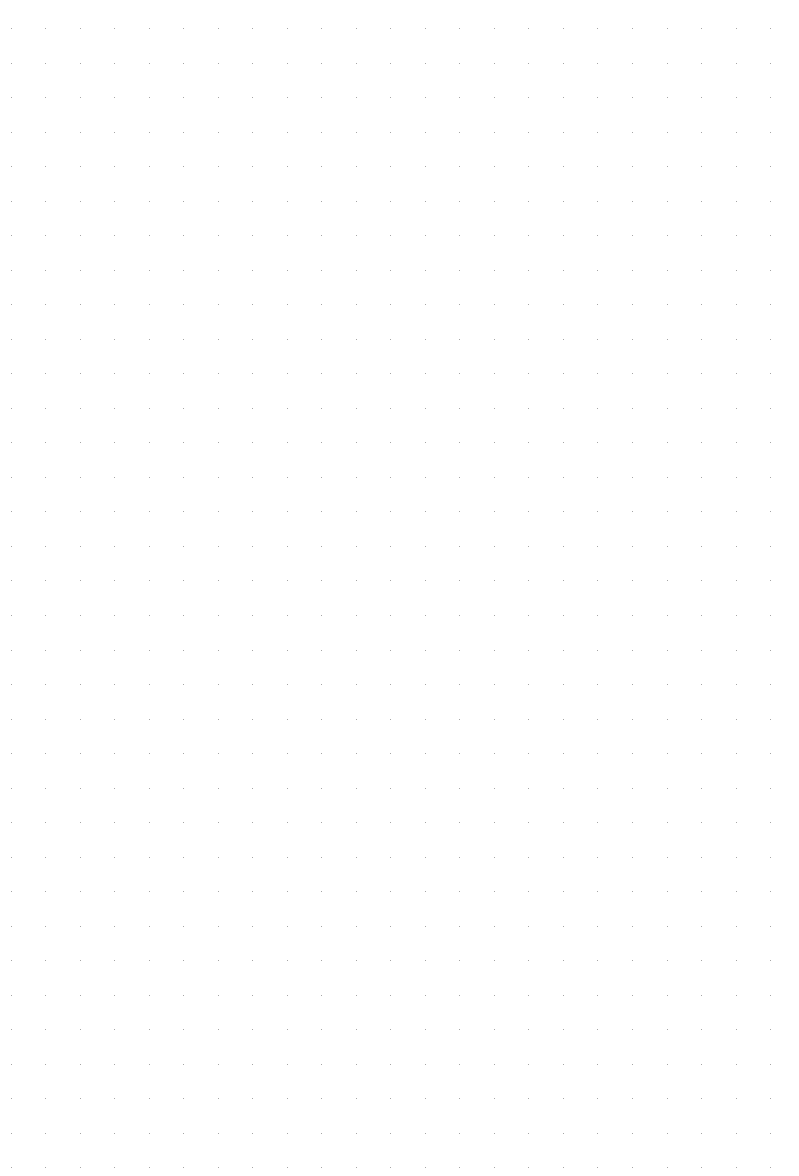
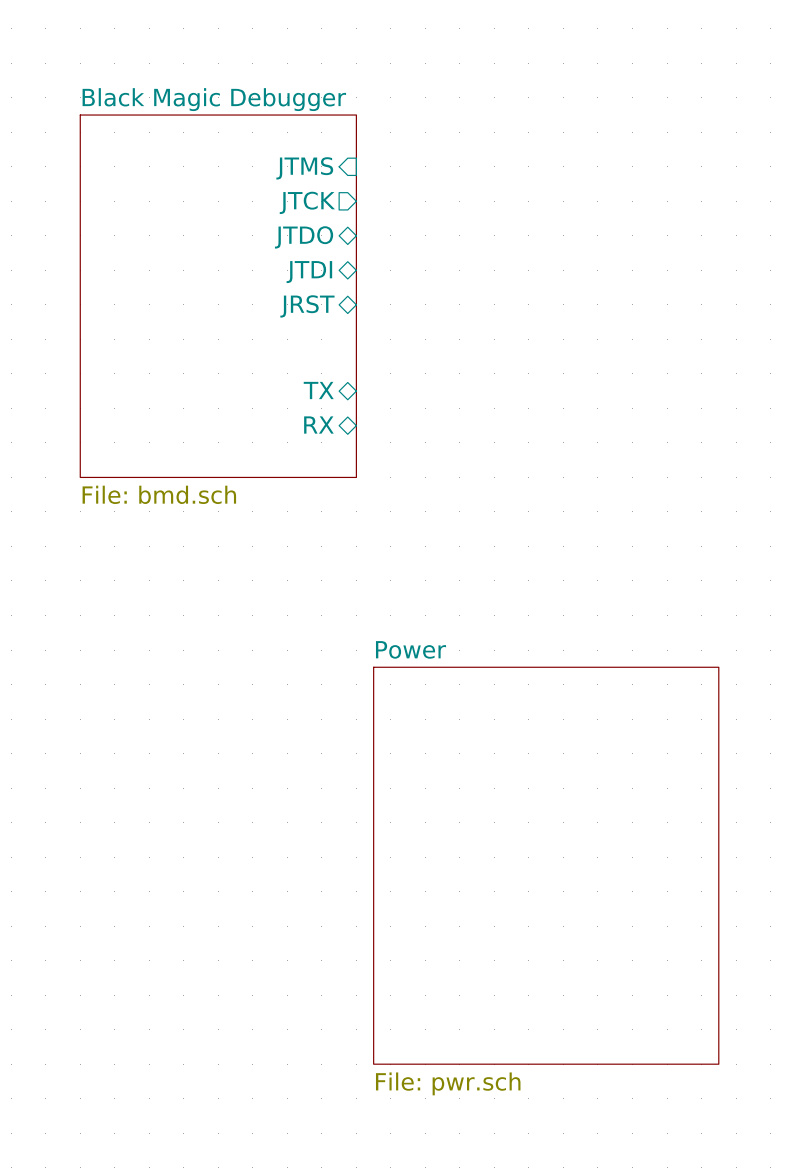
sheet pin: none -> JTMS (304, 168)
sheet pin: none -> JTCK (307, 202)
sheet pin: none -> JTDO (304, 237)
sheet pin: none -> JTDI (309, 272)
sheet Black Magic Debugger: none -> File: bmd.sch (218, 296)
sheet pin: none -> JRST (307, 306)
sheet pin: none -> TX (318, 390)
sheet pin: none -> RX (318, 425)
sheet Power: none -> File: pwr.sch (546, 865)

